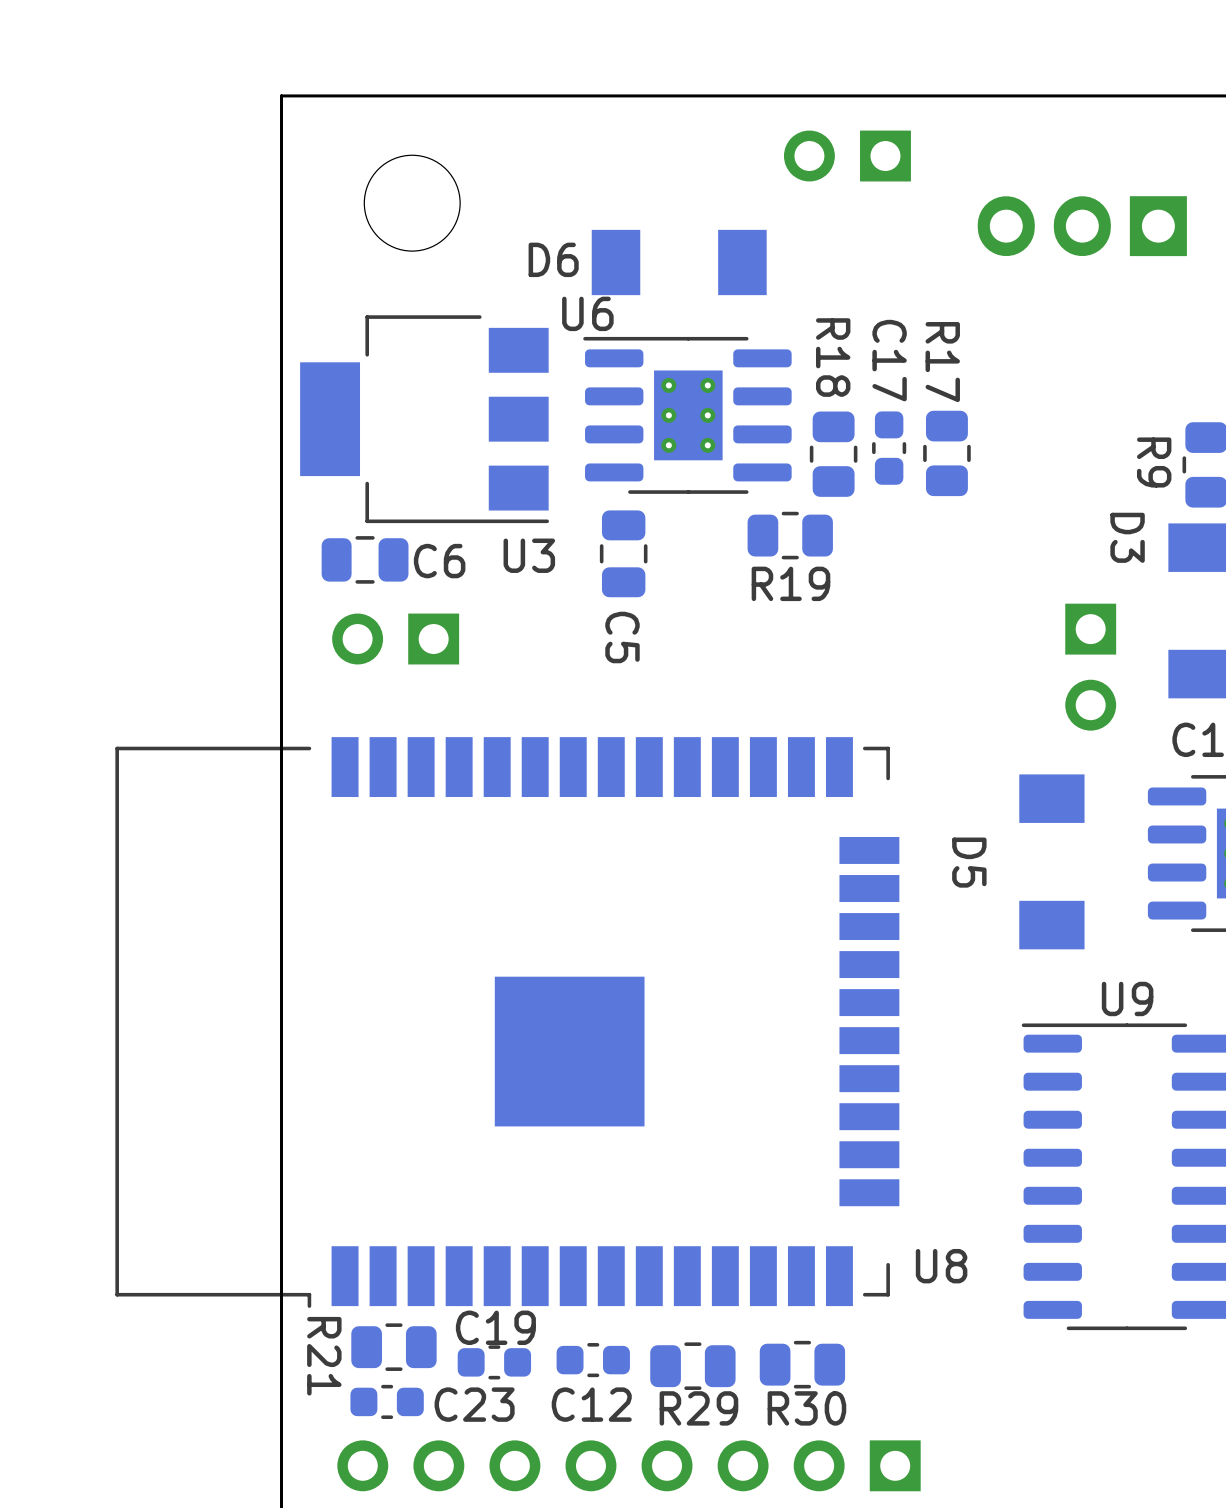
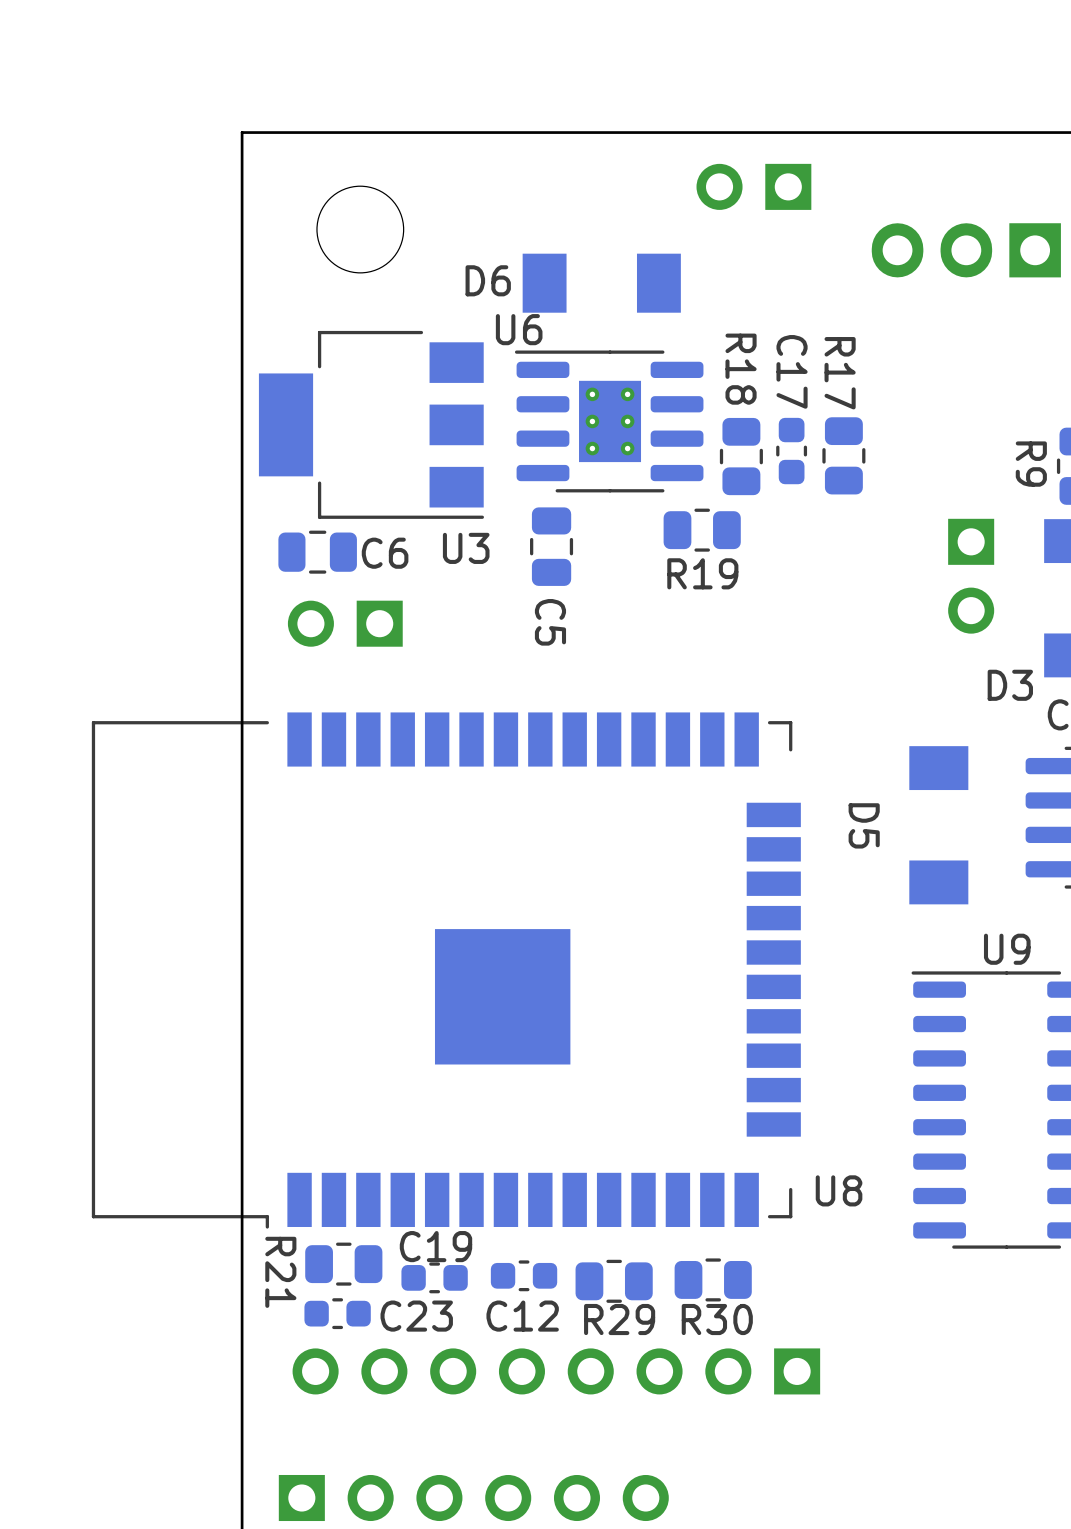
D3 name rotation: 0° (1127, 537) -> 90° counterclockwise (1010, 685)
D3 name position: D3 (1127, 537) -> D3 (1010, 685)
part position: (1090, 667) -> (971, 576)

